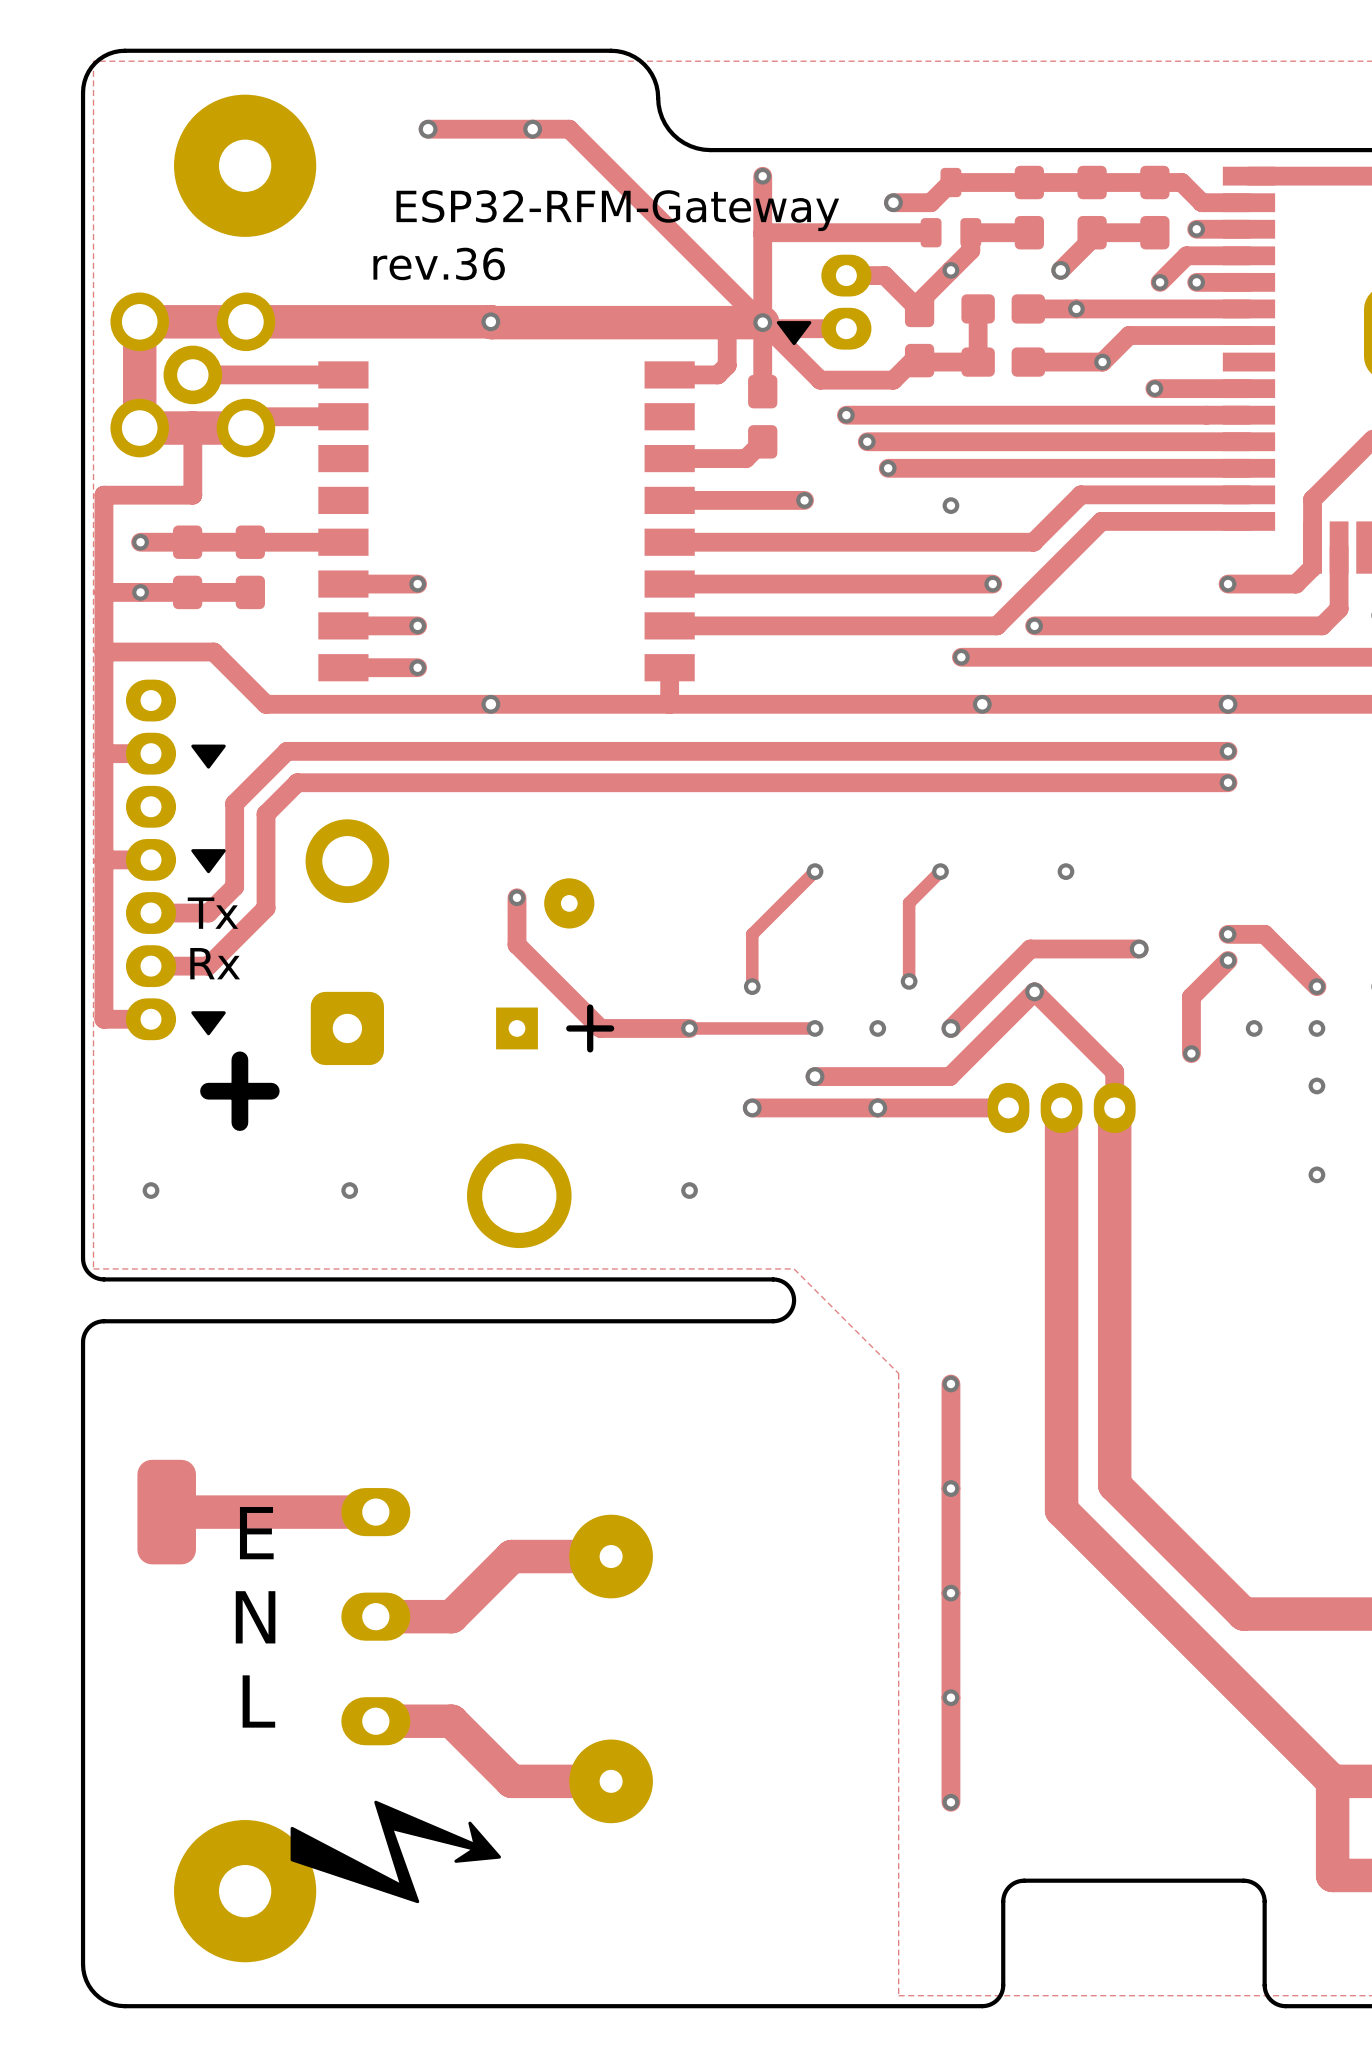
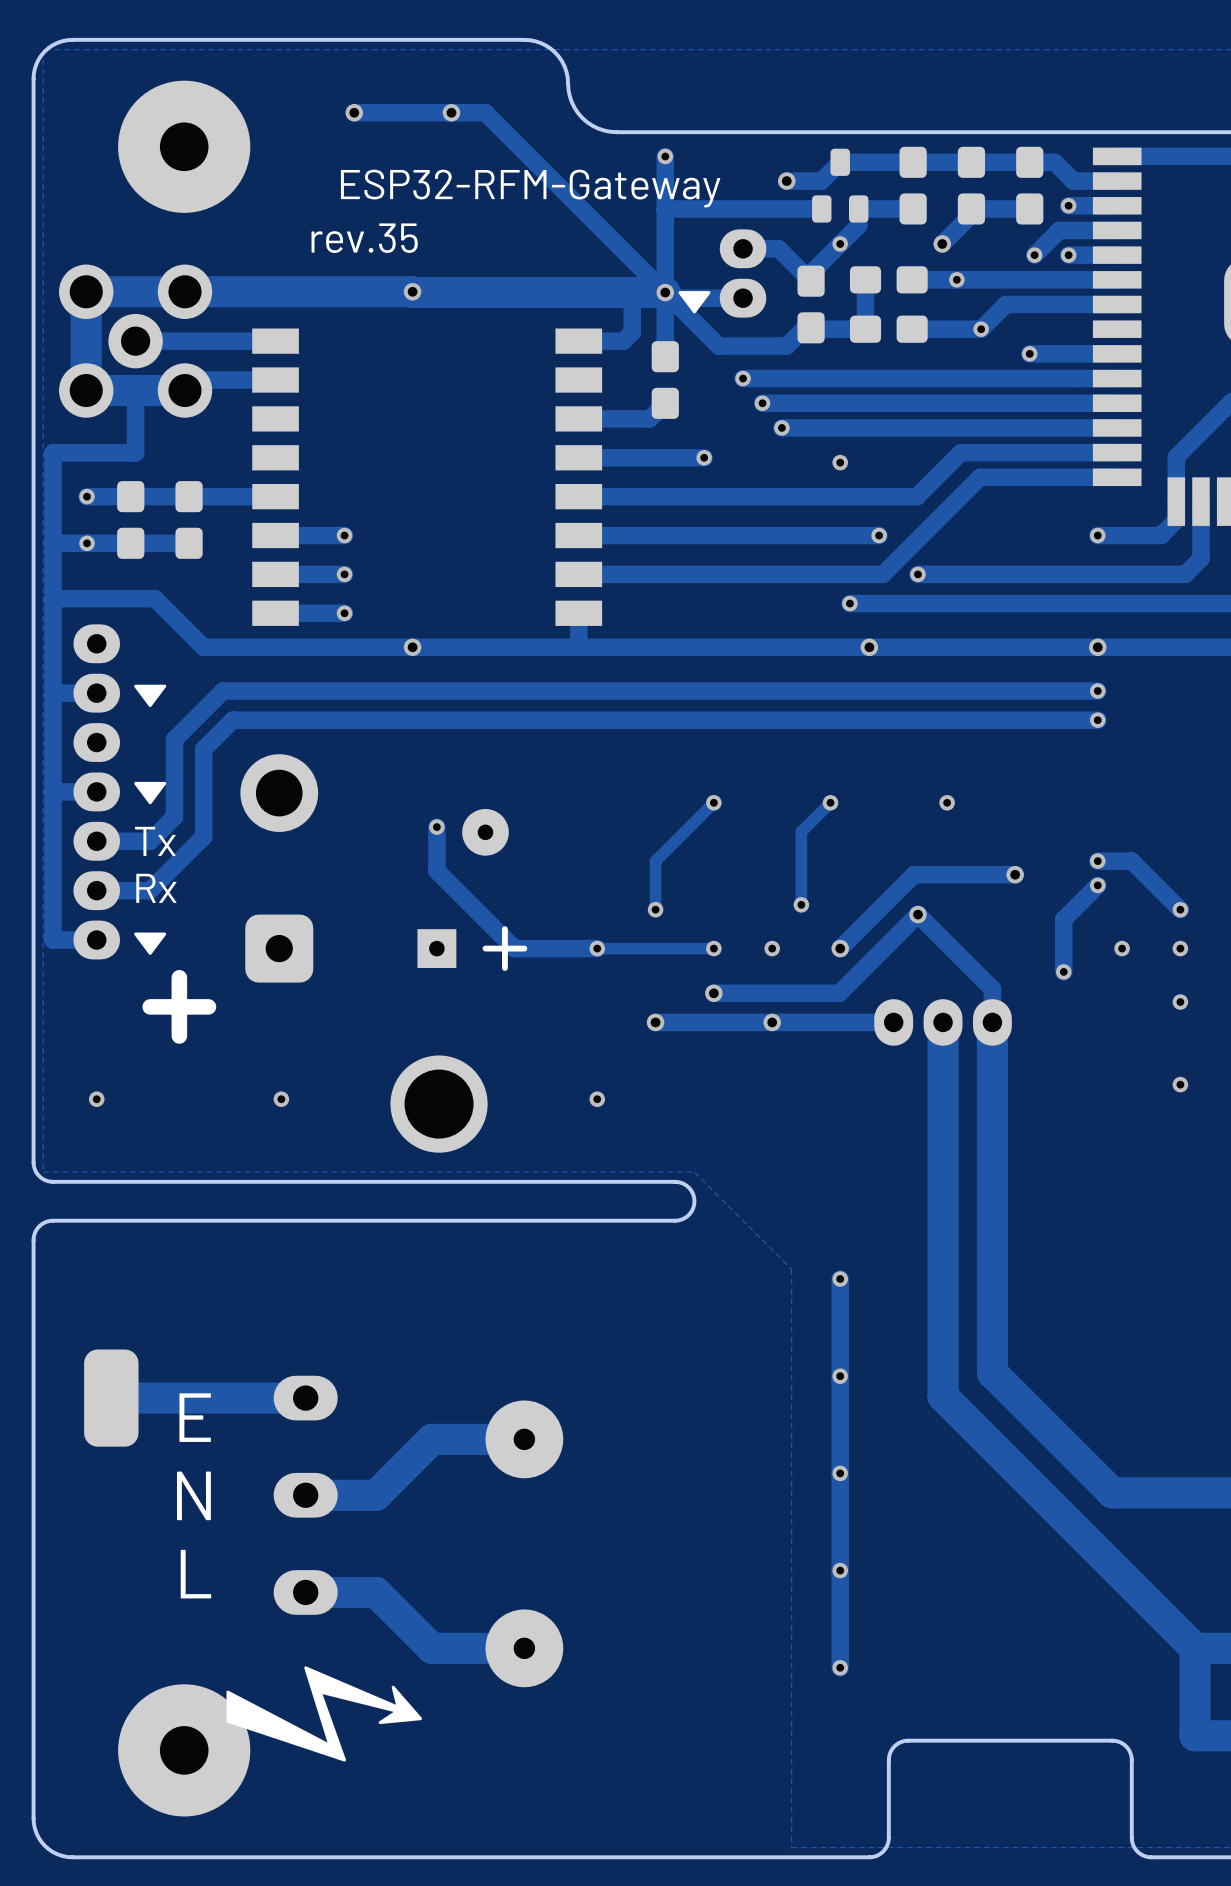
text: rev.36 (439, 263) -> rev.35 (364, 238)

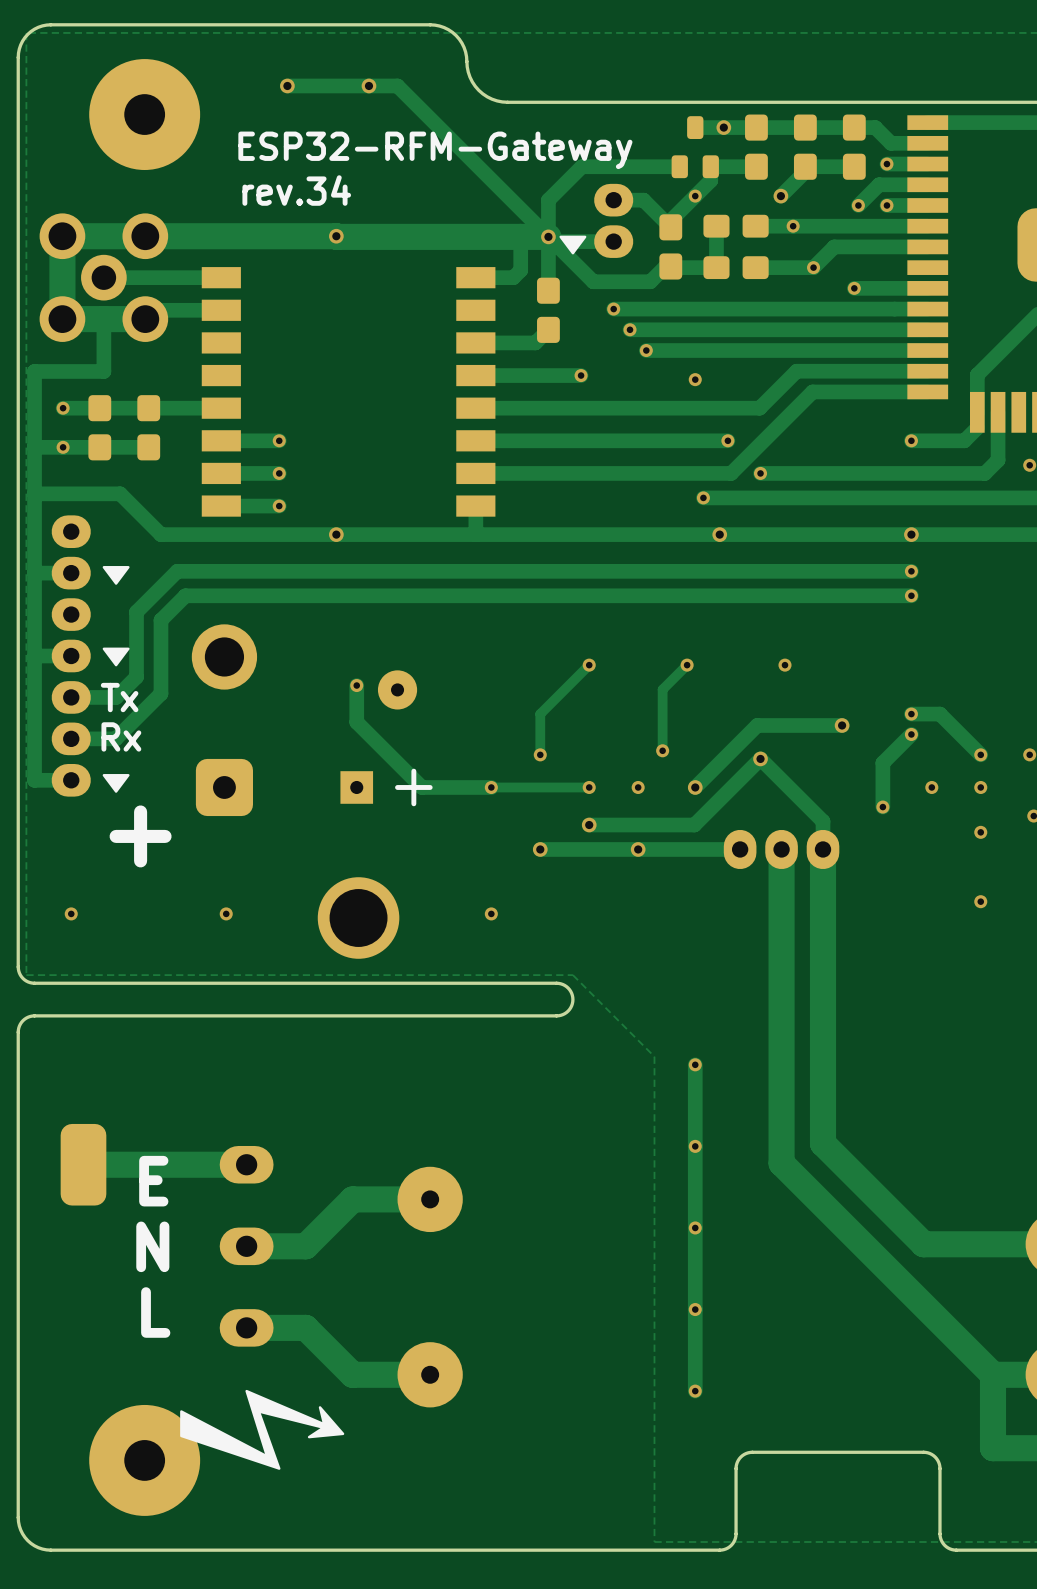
track: (665, 156) (665, 248) -> none
via: (665, 156) -> none
track: (840, 162) (821, 181) (786, 181) -> none
via position: (786, 181) -> (723, 127)
track: (705, 208) (665, 209) -> (581, 166) (548, 200)
text: rev.35 (364, 238) -> rev.34 (296, 190)

